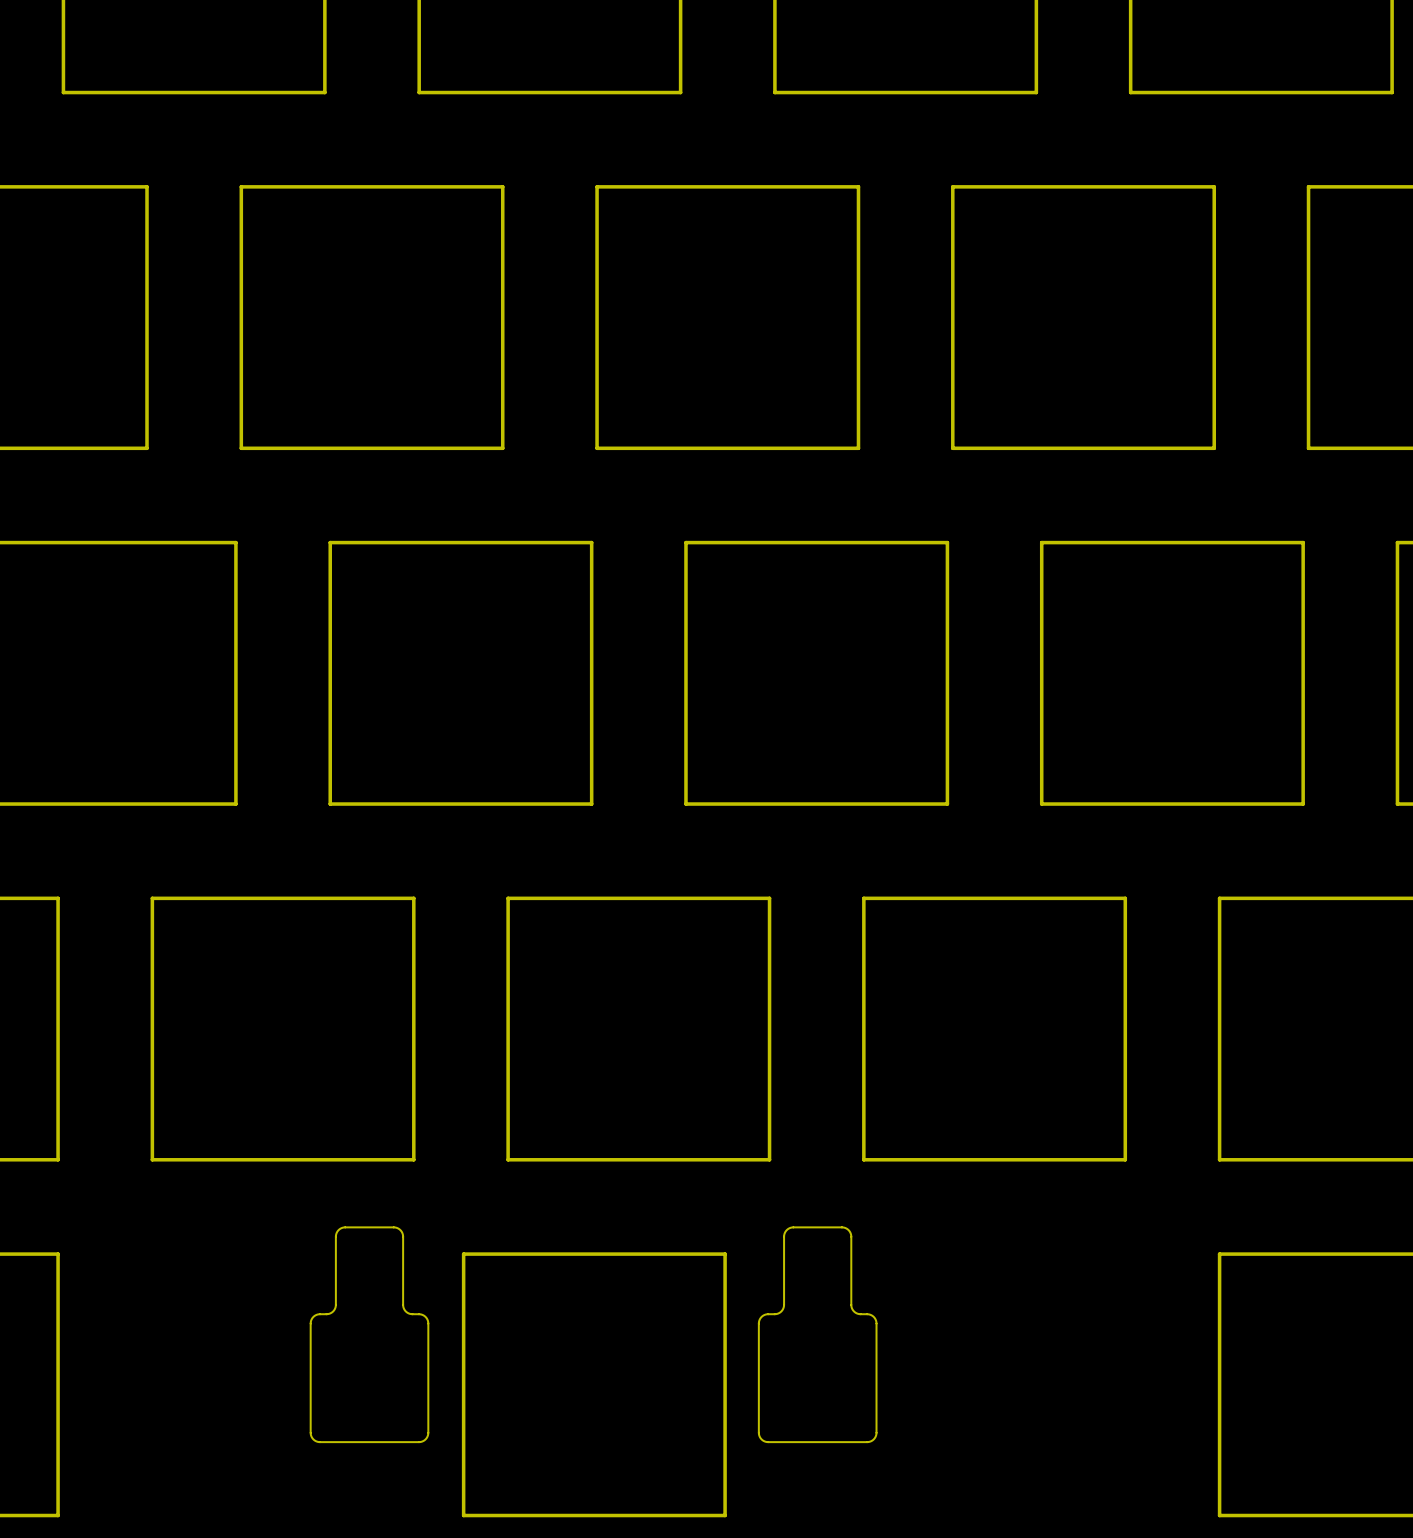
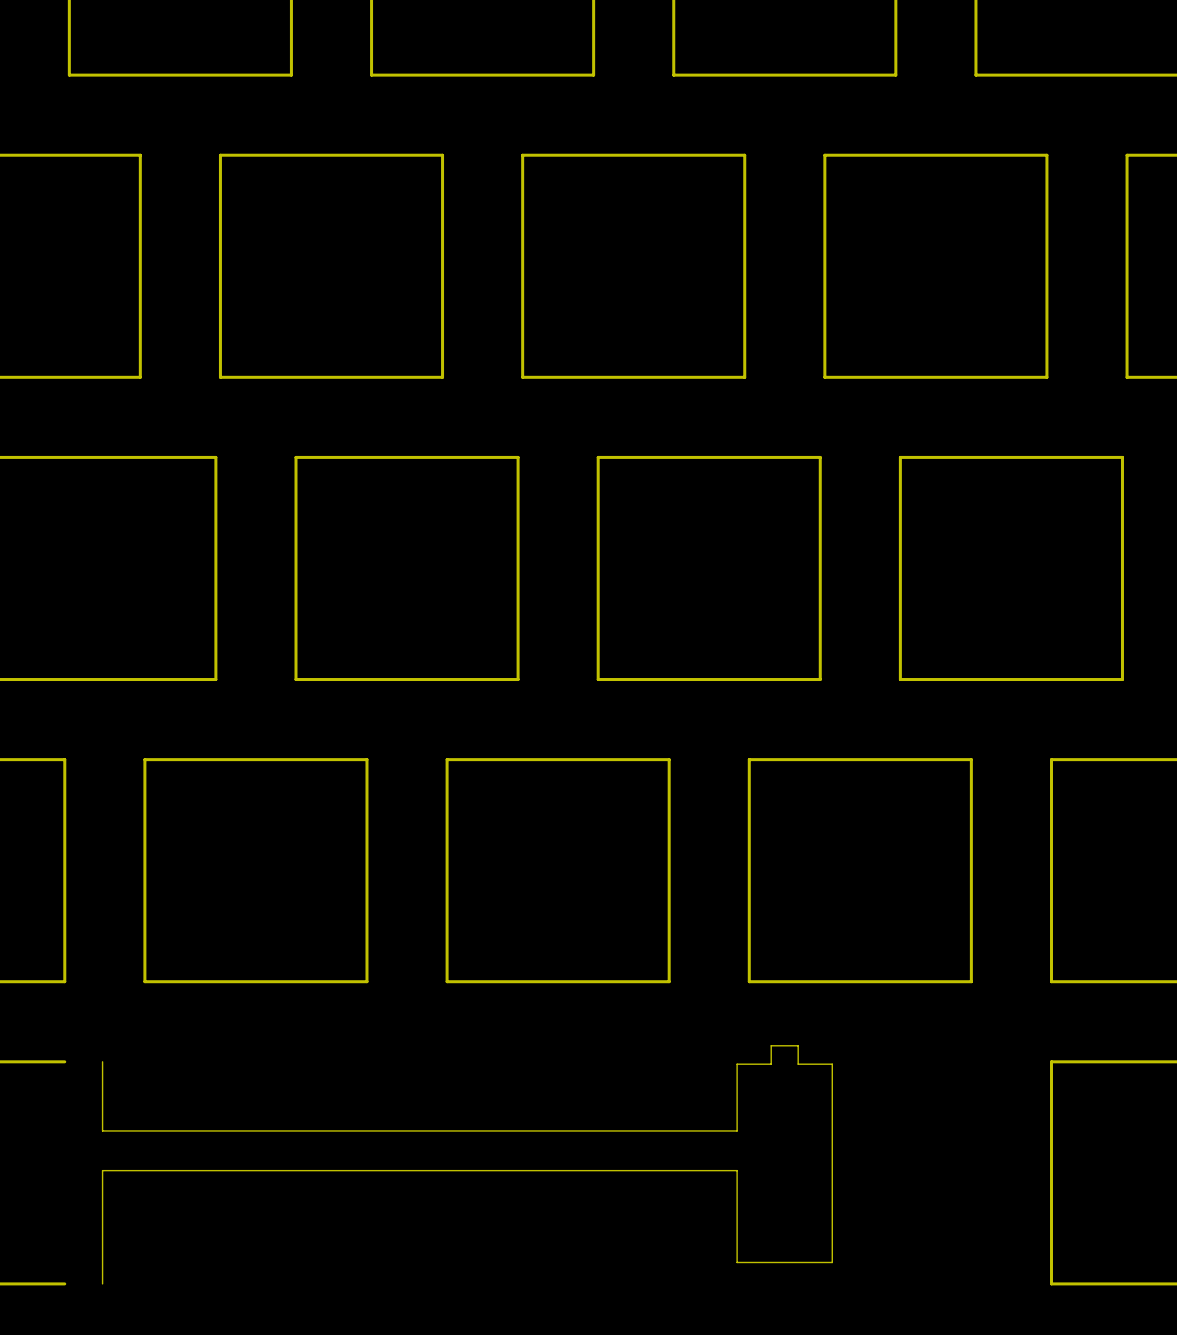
drawing: [310, 1226, 877, 1443] -> none
board edge: (58, 1254) (58, 1515) -> none
board edge: none -> (102, 1061) (102, 1130) (737, 1130) (737, 1064) (771, 1064) (771, 1045) (798, 1045) (798, 1064) (832, 1064) (832, 1262) (737, 1262) (737, 1170) (102, 1170) (102, 1283)
board edge: (463, 1254) (725, 1254) (725, 1515) (463, 1515) (463, 1254) -> none

